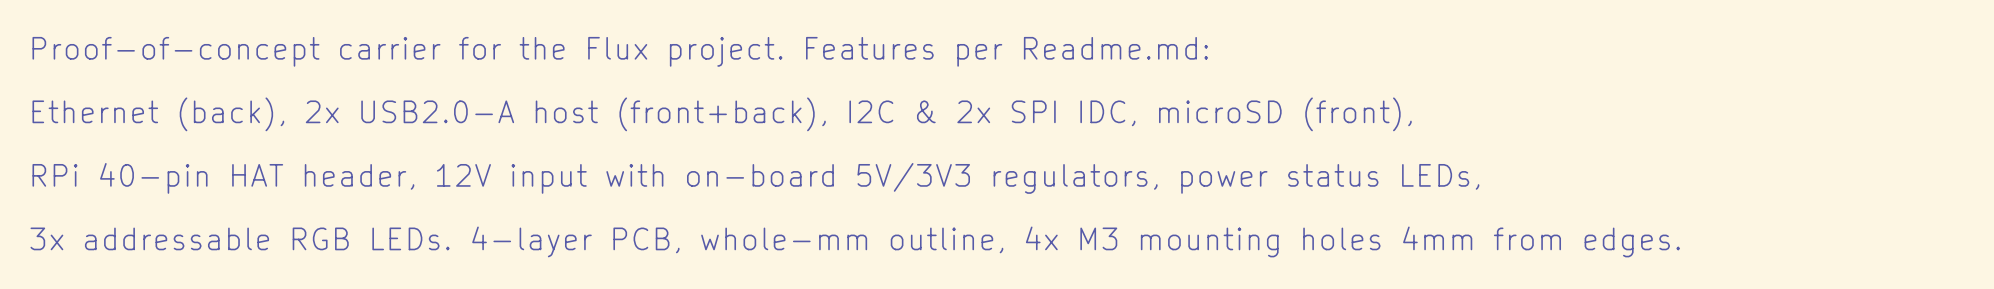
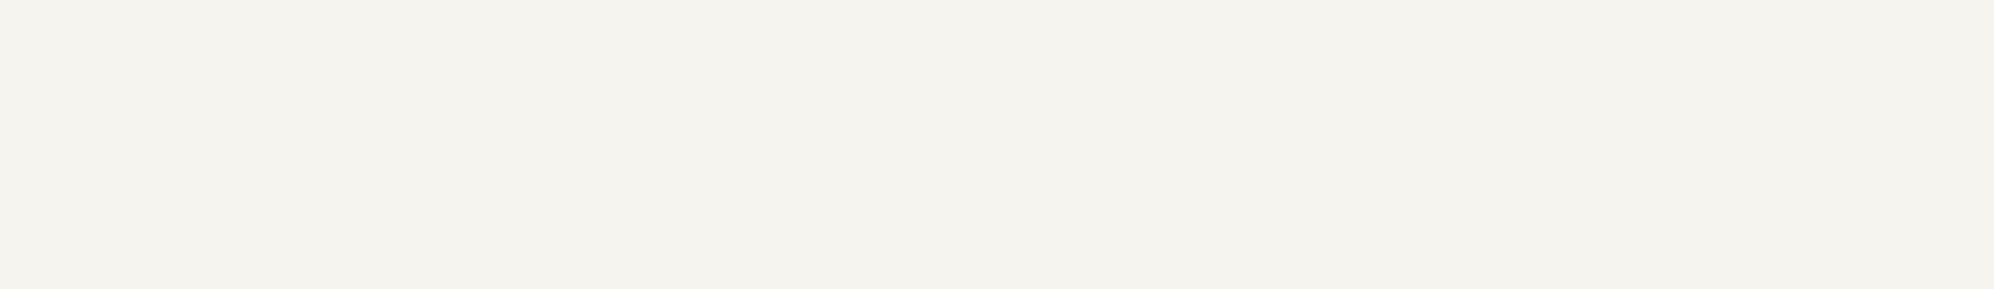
text: Proof-of-concept carrier for the Flux project. Features per Readme.md: (620, 51) -> none
text: Ethernet (back), 2x USB2.0-A host (front+back), I2C & 2x SPI IDC, microSD (front), (722, 114) -> none
text: RPi 40-pin HAT header, 12V input with on-board 5V/3V3 regulators, power status LEDs, (755, 178) -> none
text: 3x addressable RGB LEDs. 4-layer PCB, whole-mm outline, 4x M3 mounting holes 4mm from edges. (855, 241) -> none

